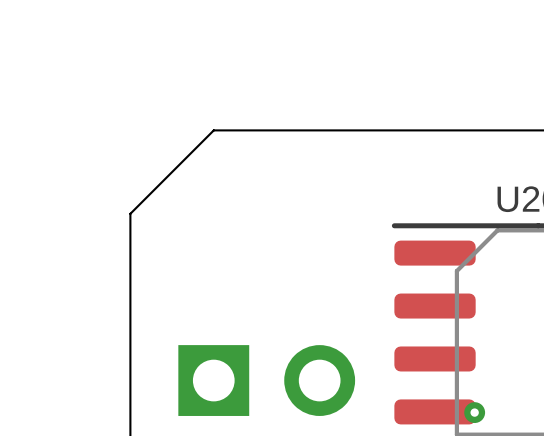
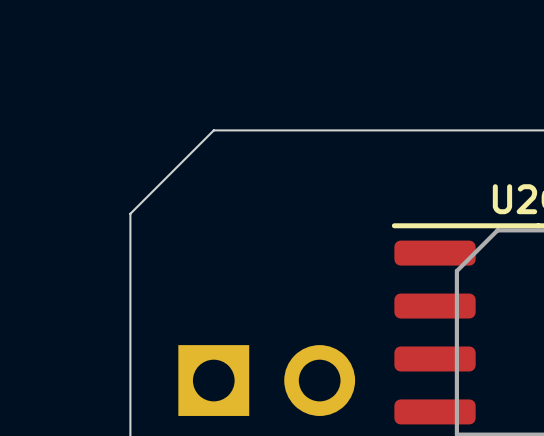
via: (474, 412) -> none

